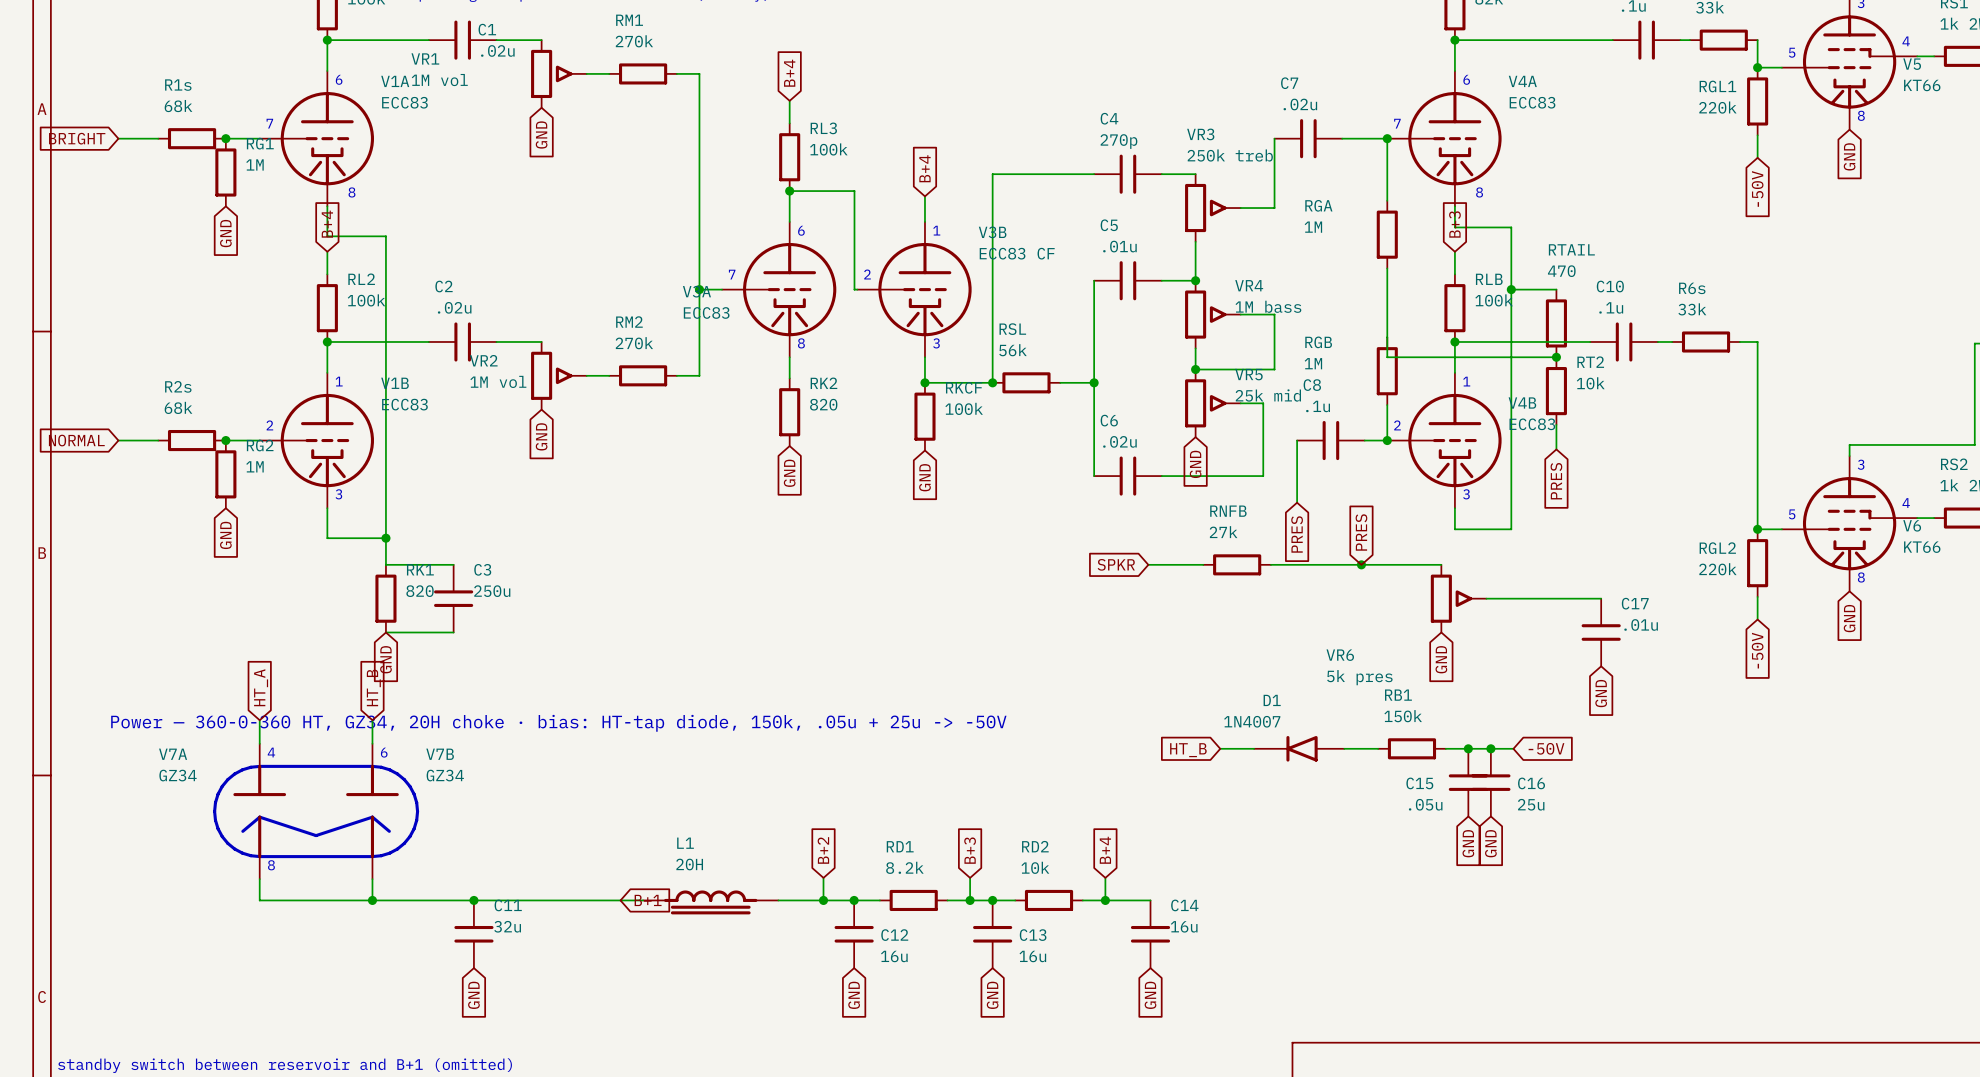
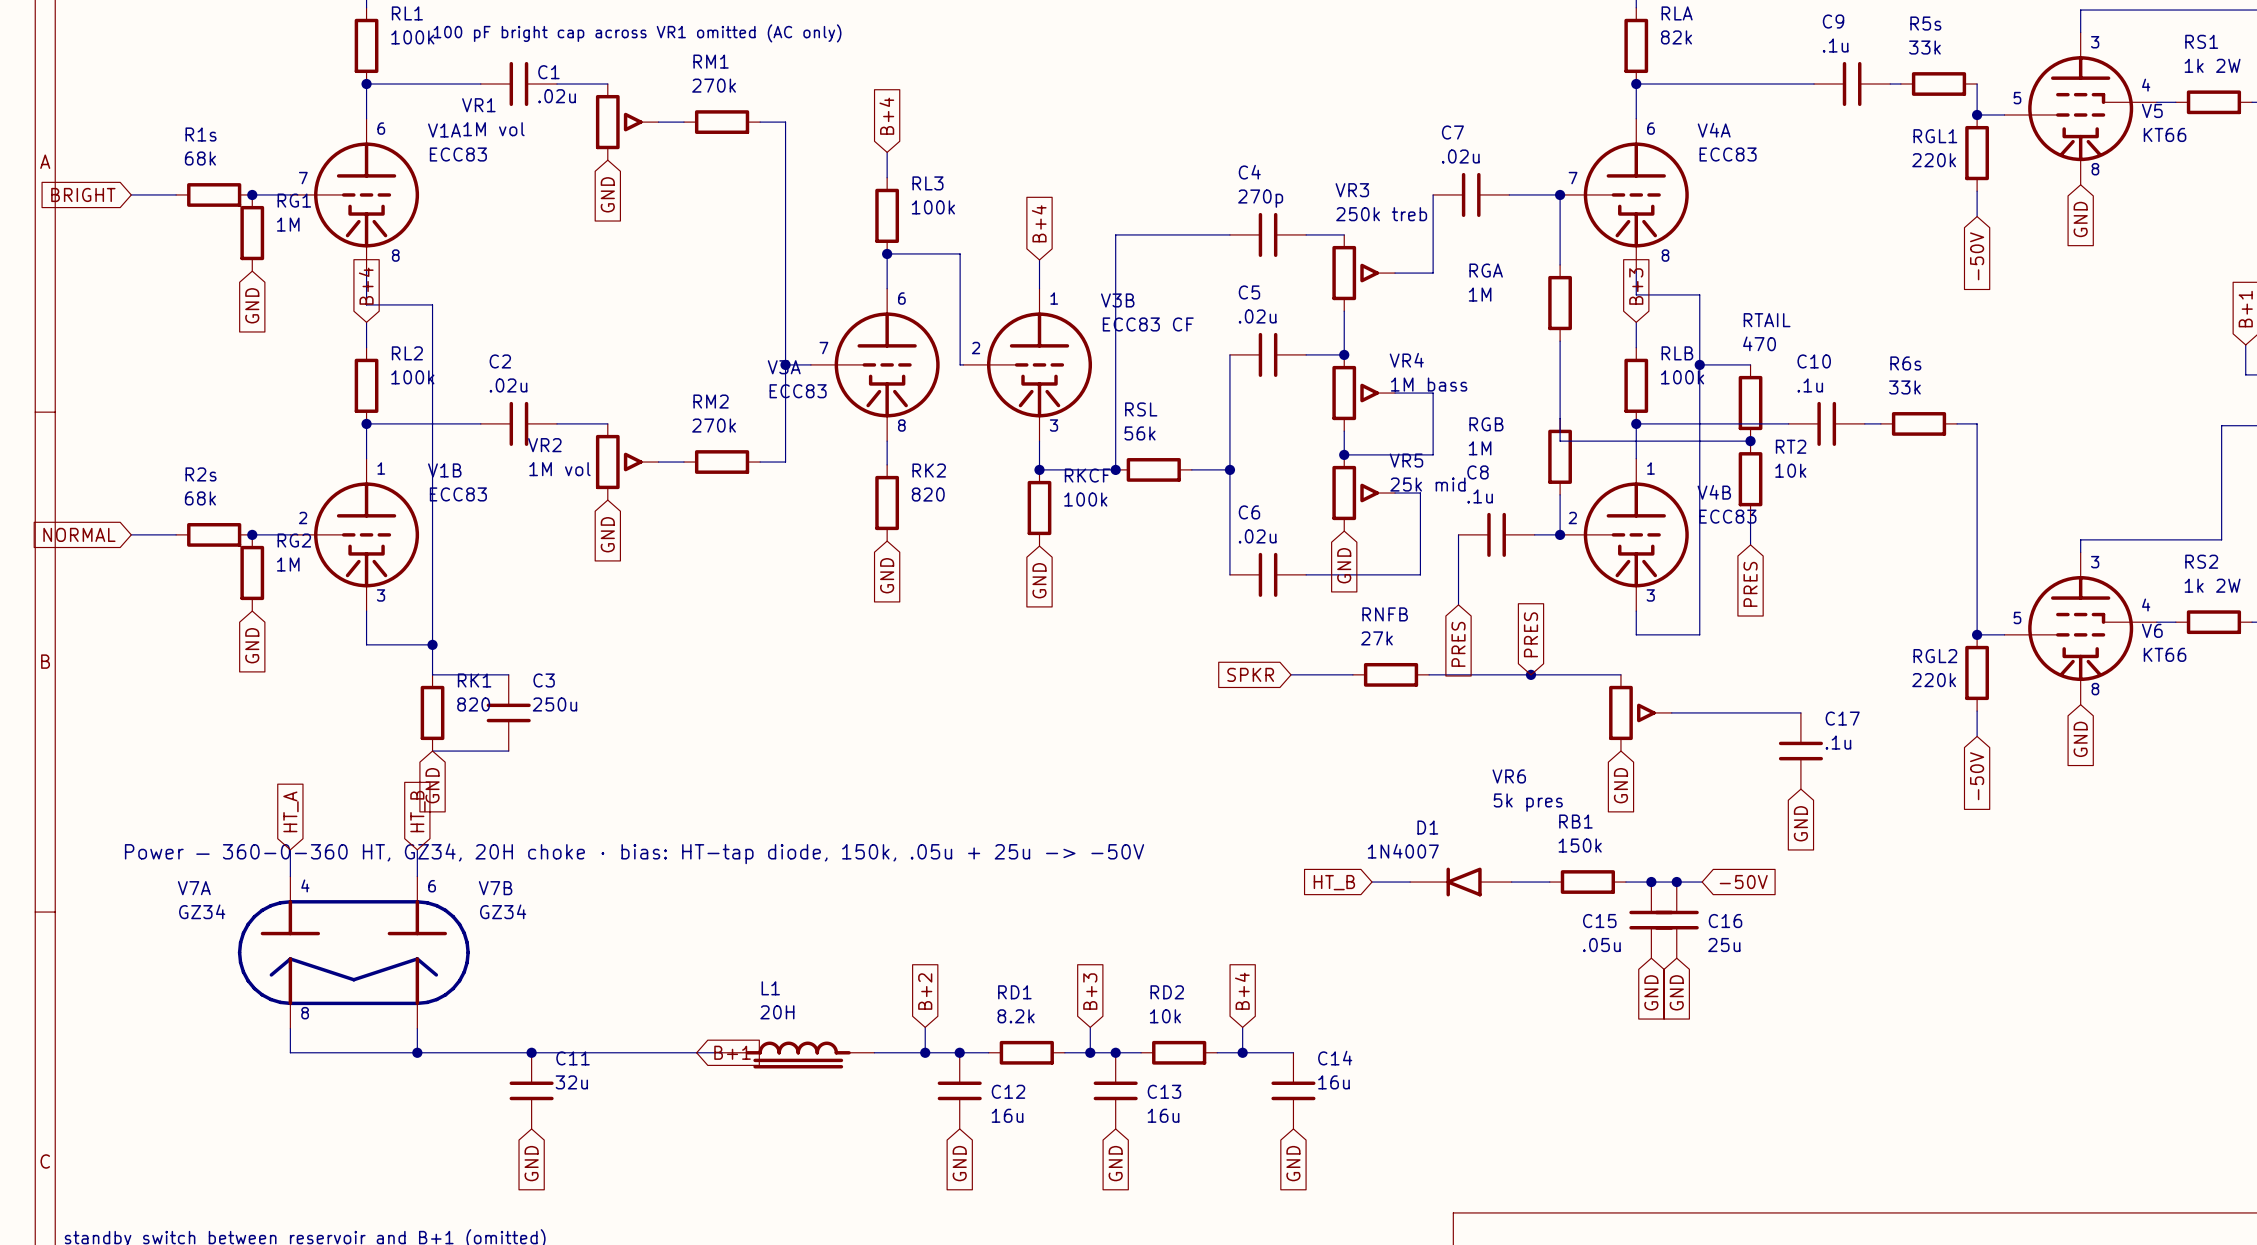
C5 value: .01u (1119, 246) -> .02u (1257, 316)
C17 value: .01u (1641, 624) -> .1u (1838, 742)

